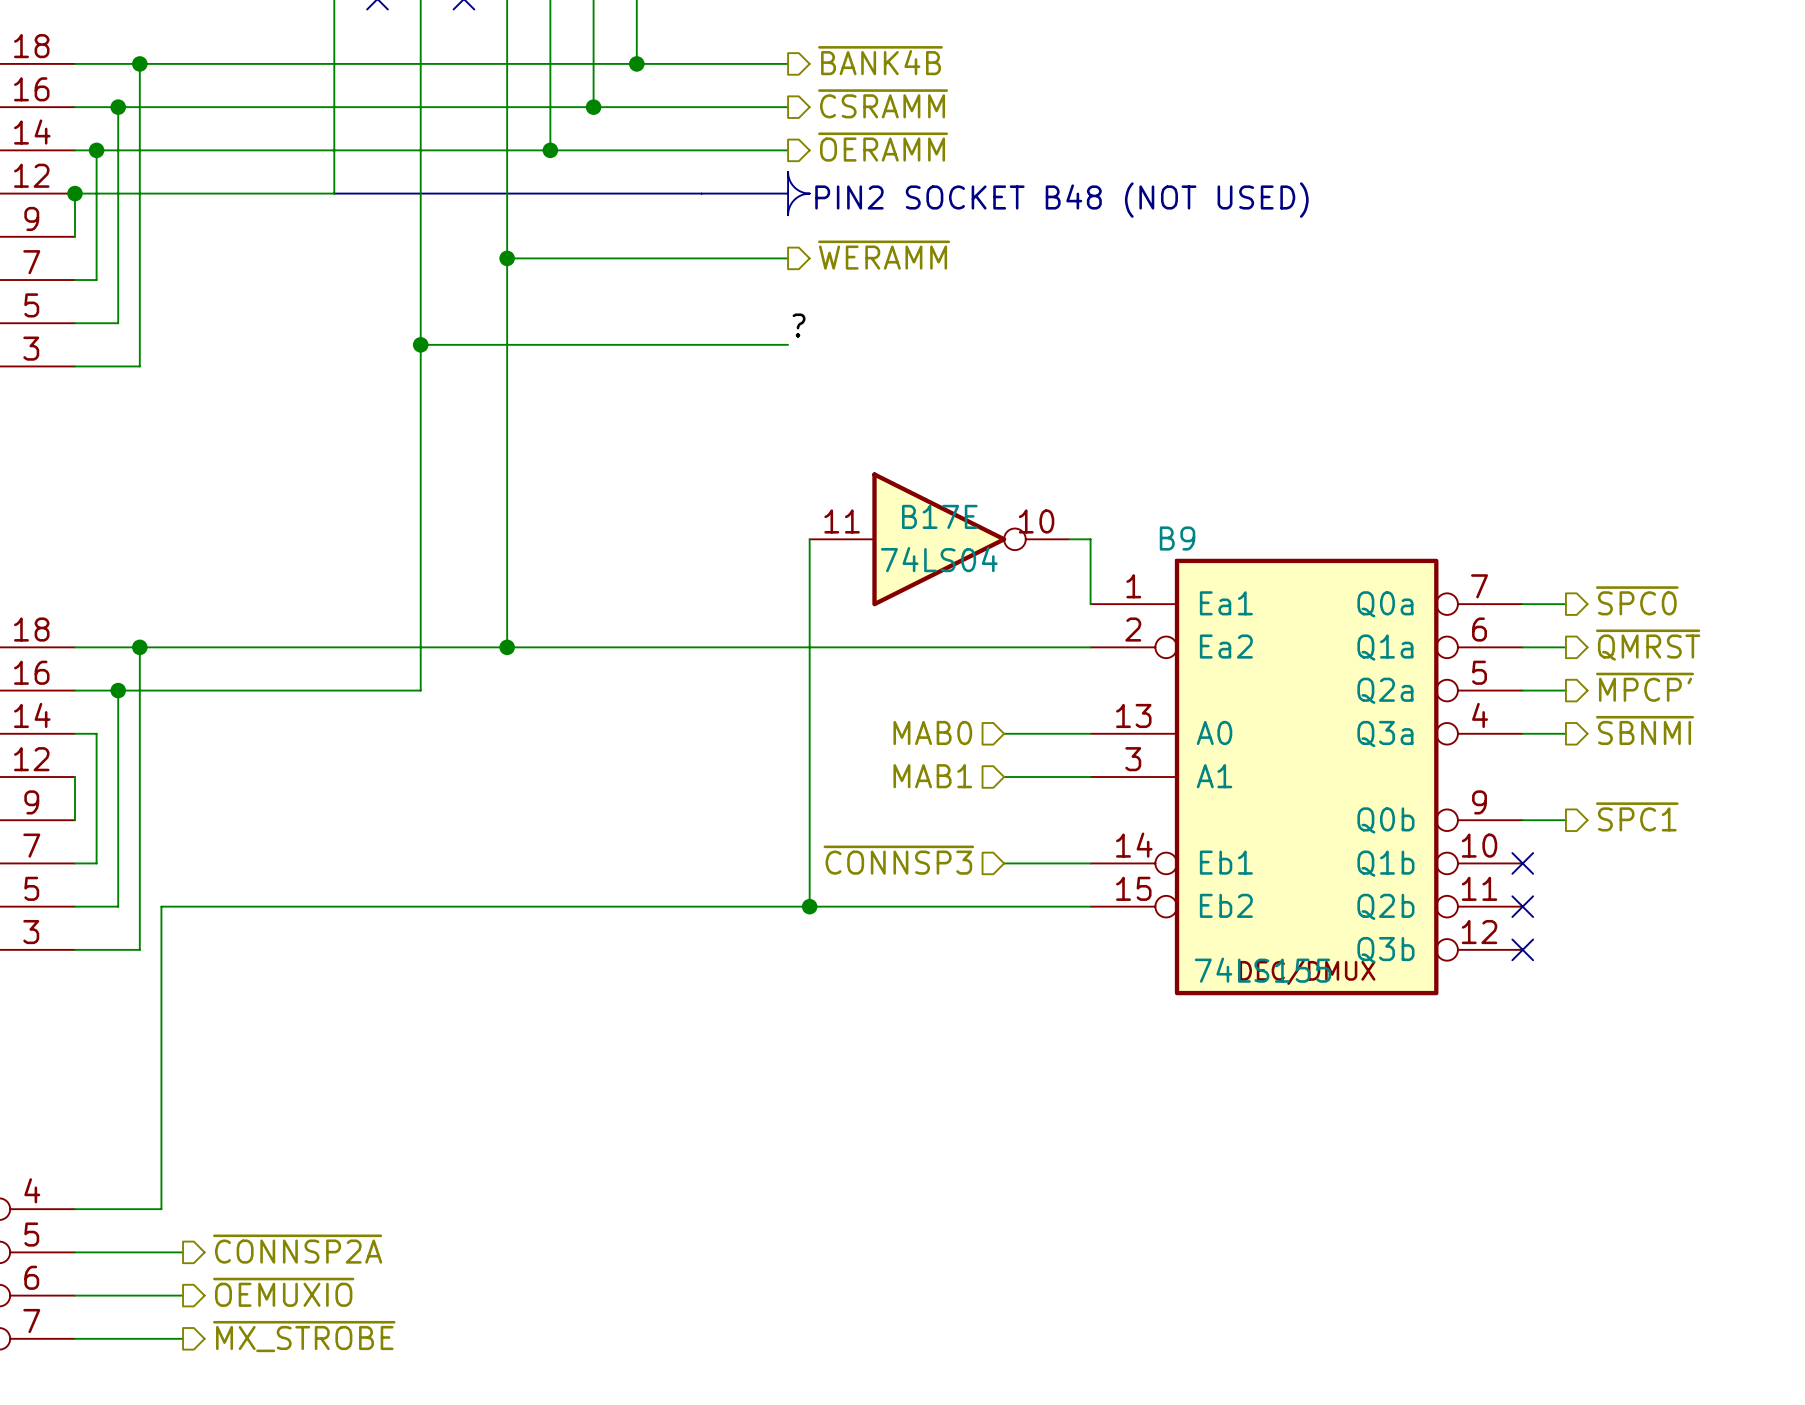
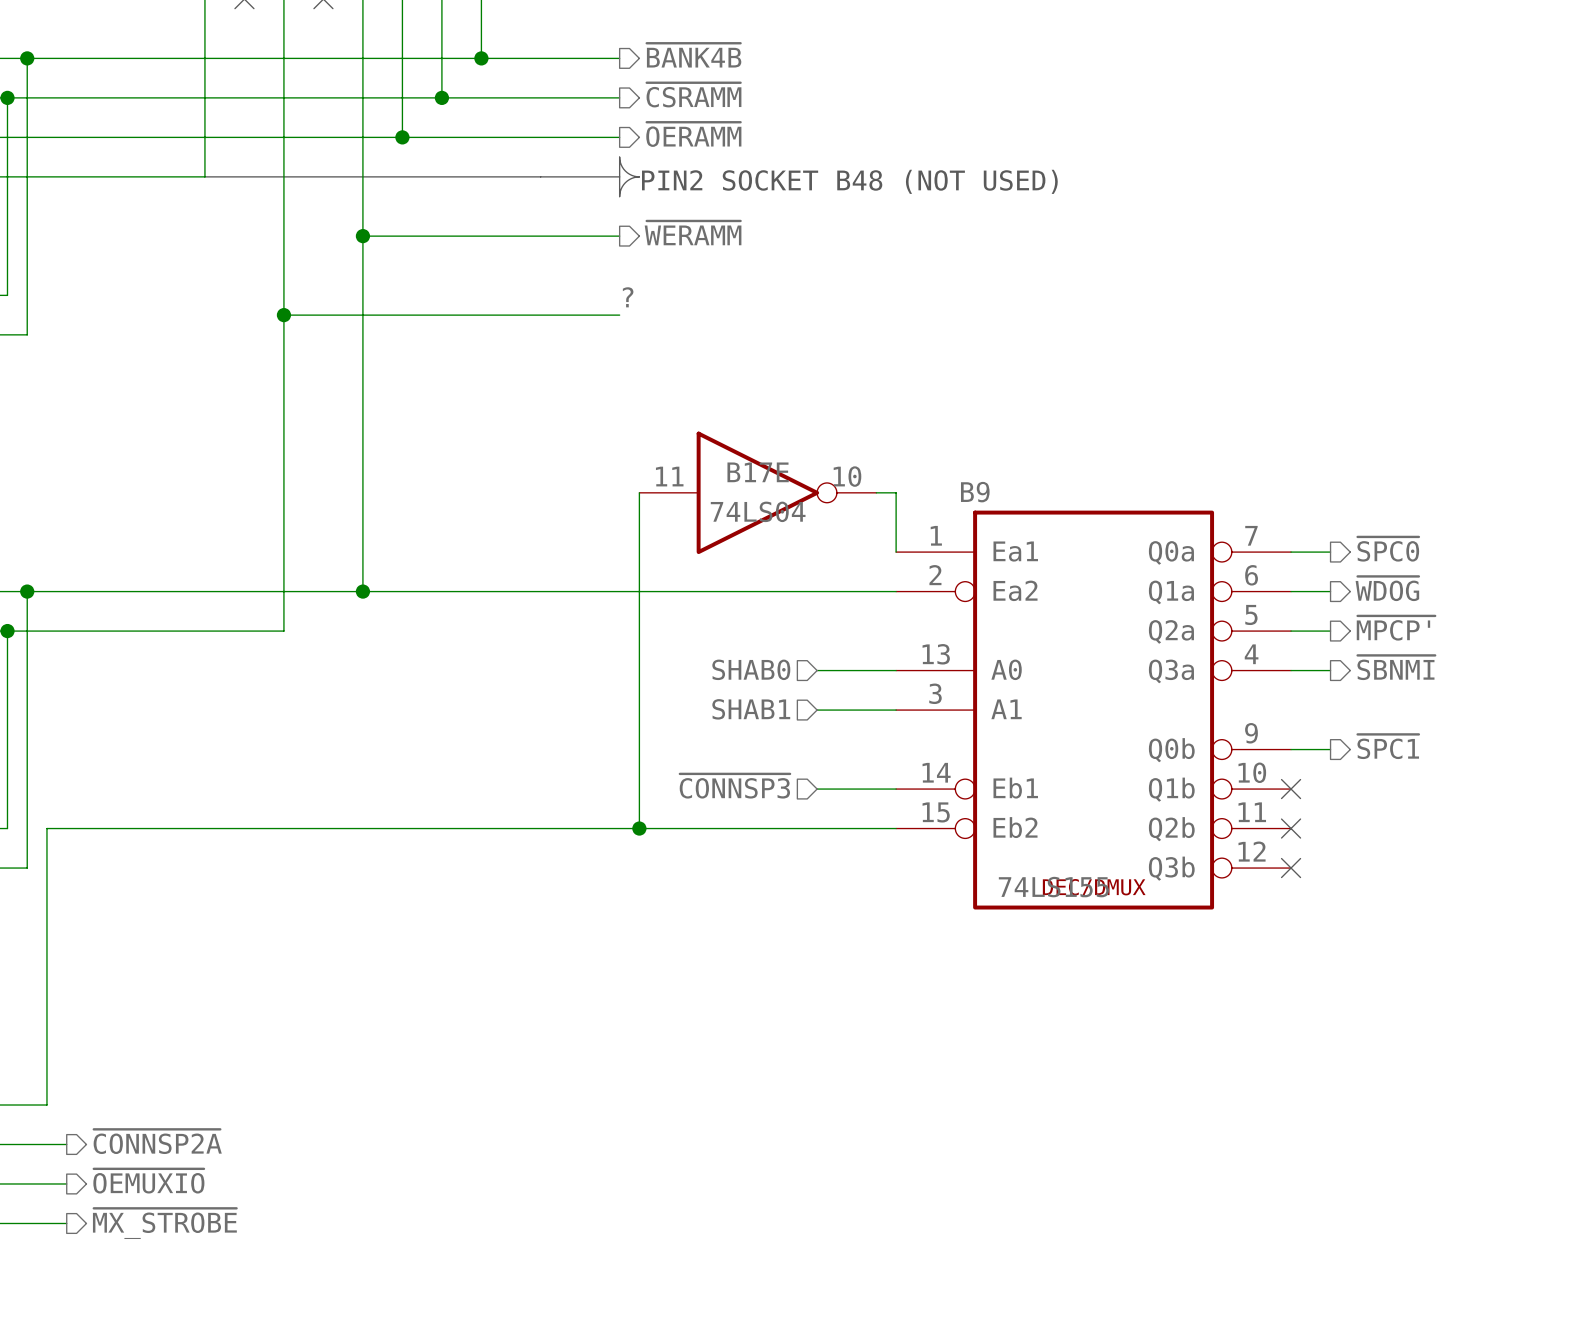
hierarchical label: ~{QMRST} (1648, 645) -> ~{WDOG} (1387, 588)
hierarchical label: MAB0 (932, 732) -> SHAB0 (751, 669)
hierarchical label: MAB1 (932, 776) -> SHAB1 (751, 709)

